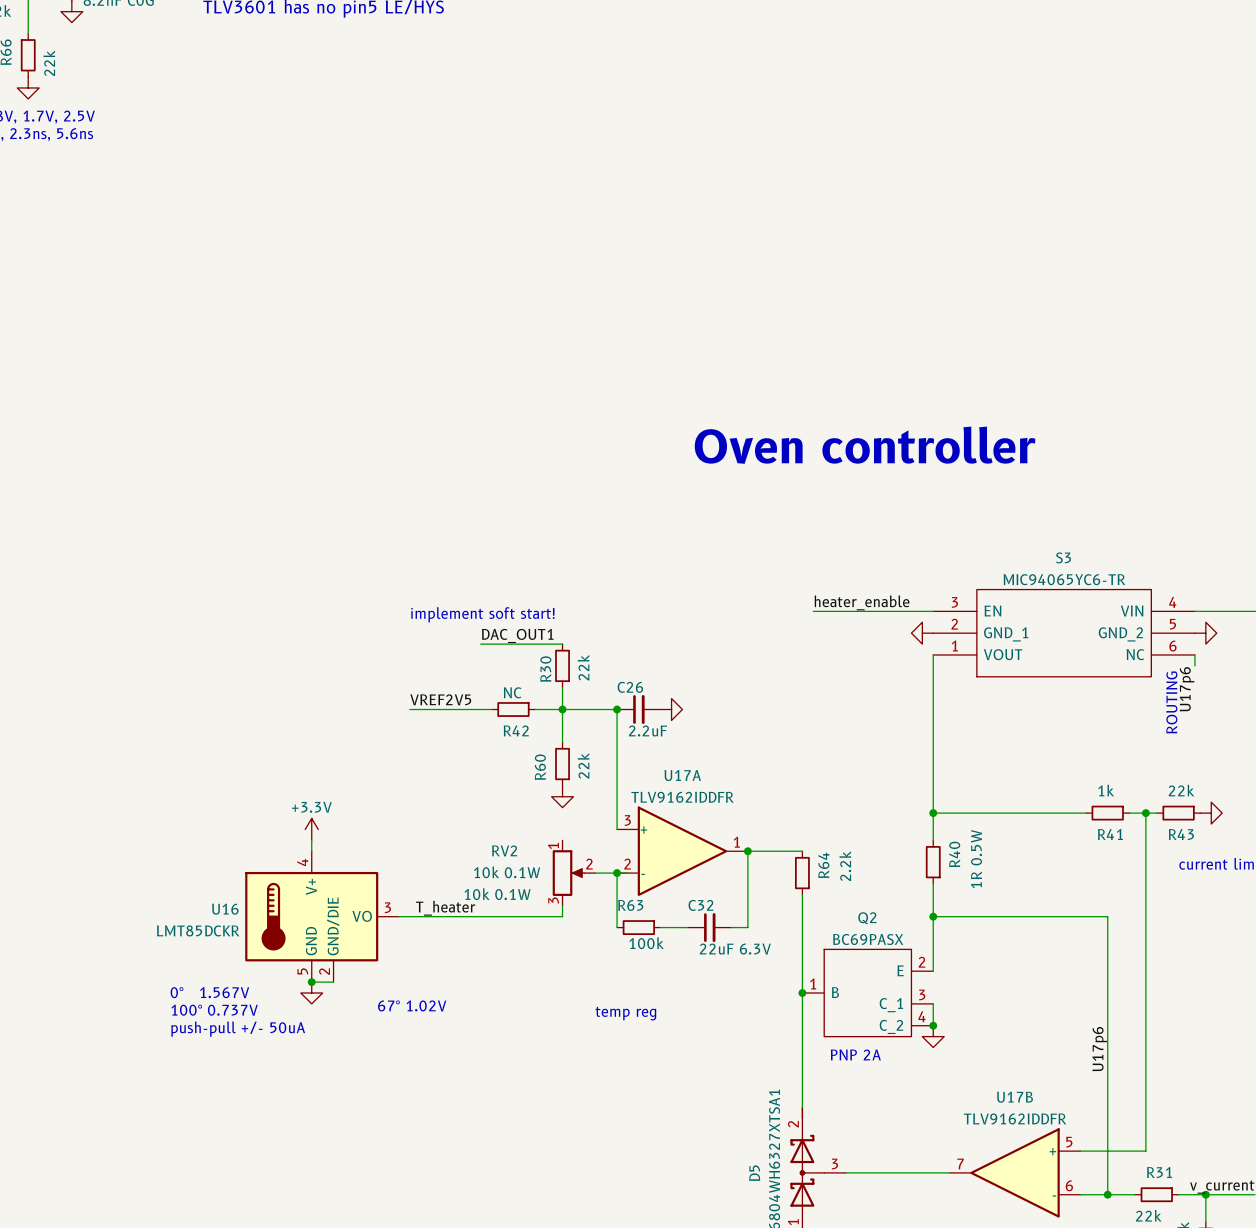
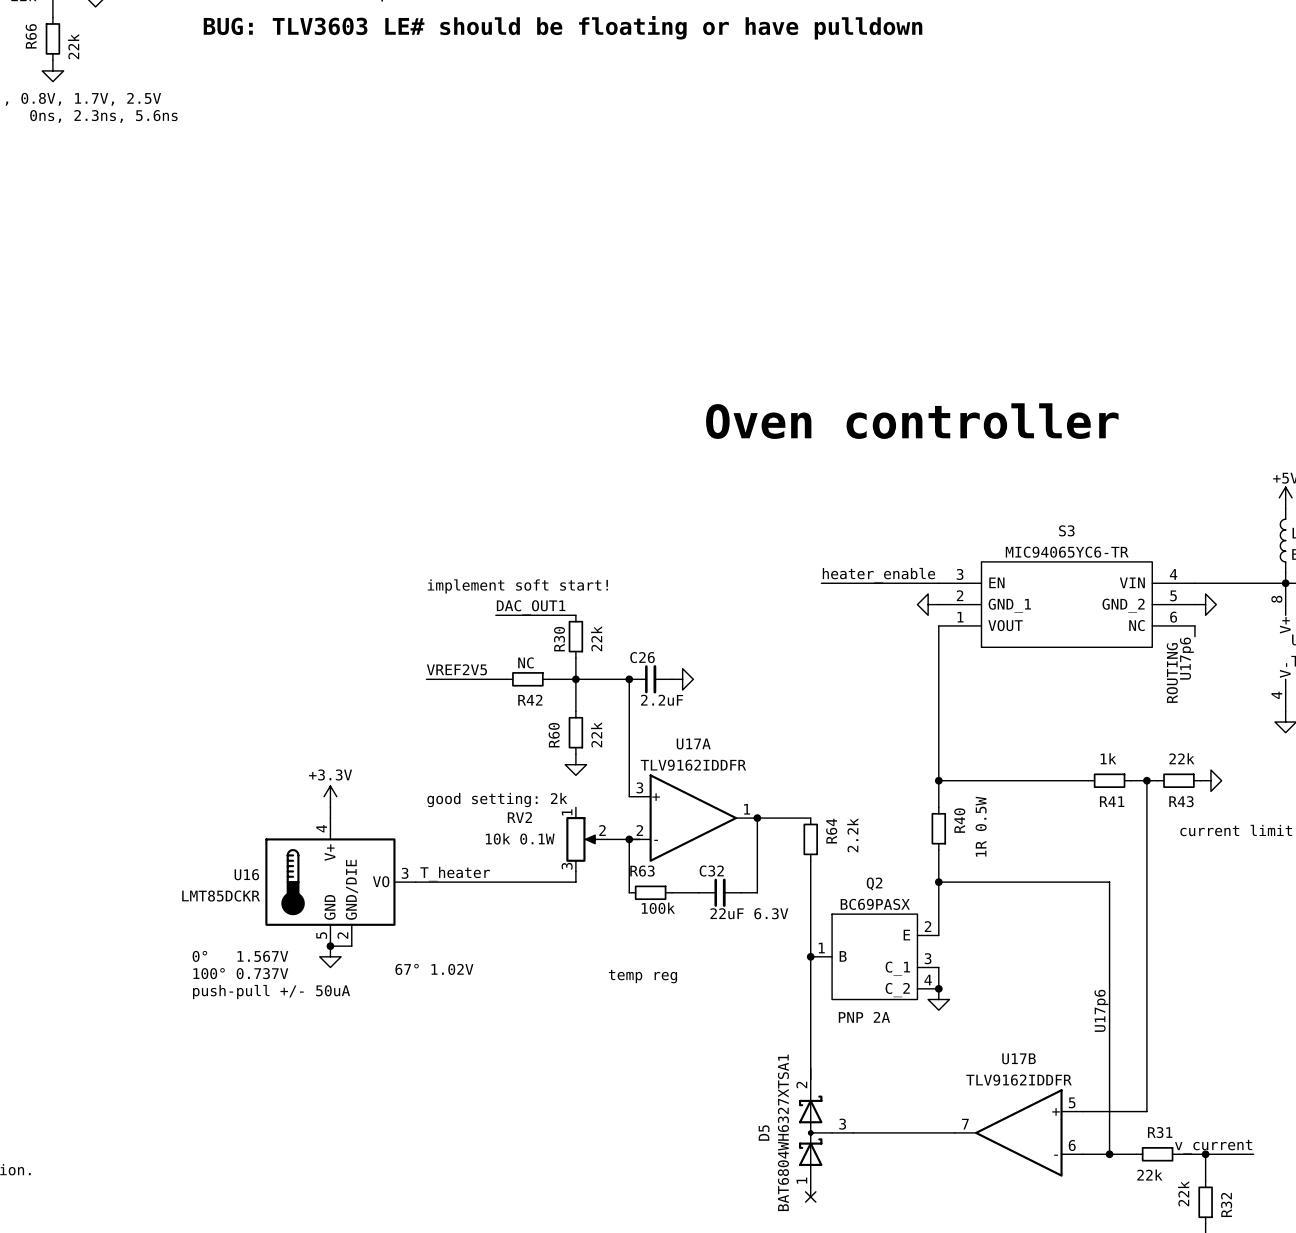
text: none -> BUG: TLV3603 LE# should be floating or have pulldown (563, 27)
text: none -> good setting: 2k (497, 800)
RV2 text: 10k 0.1W (497, 894) -> none

